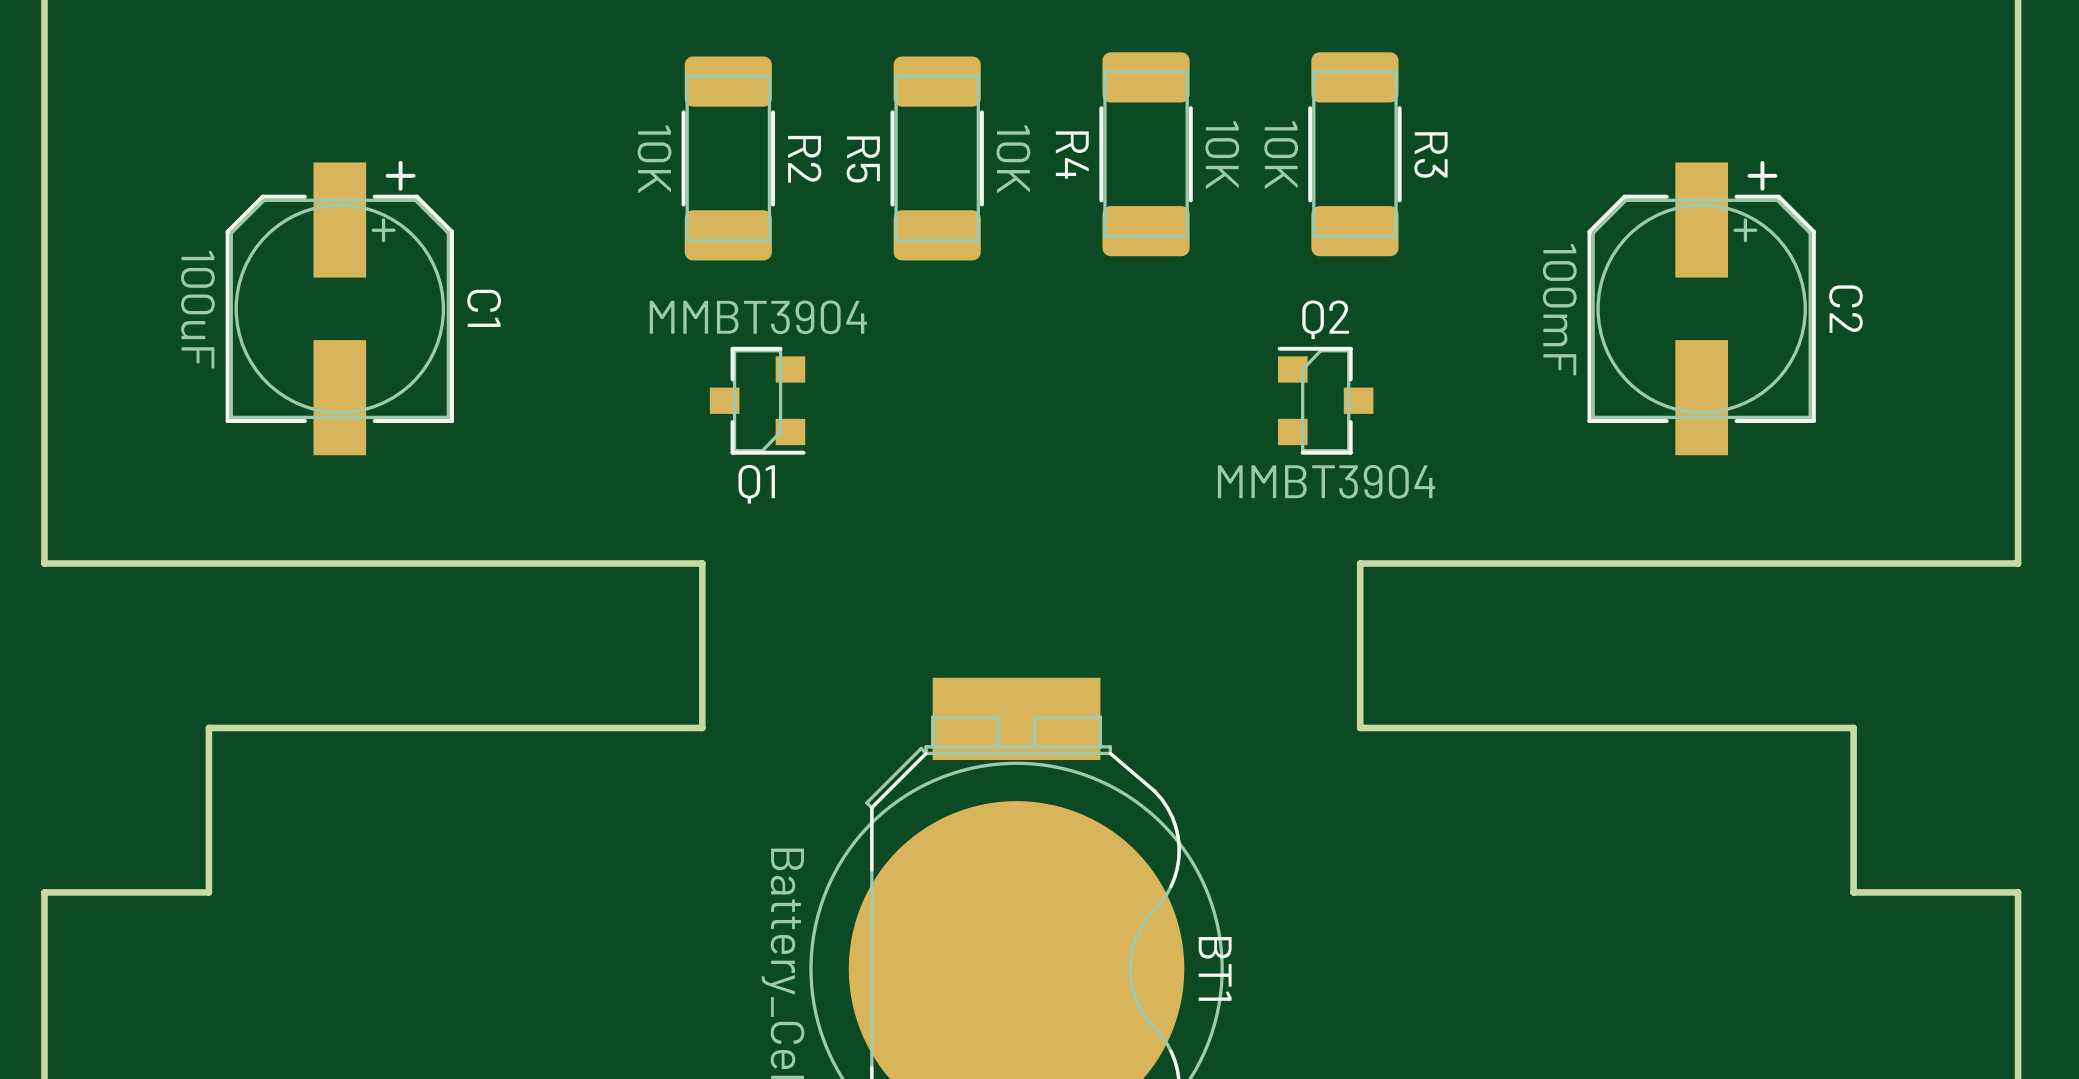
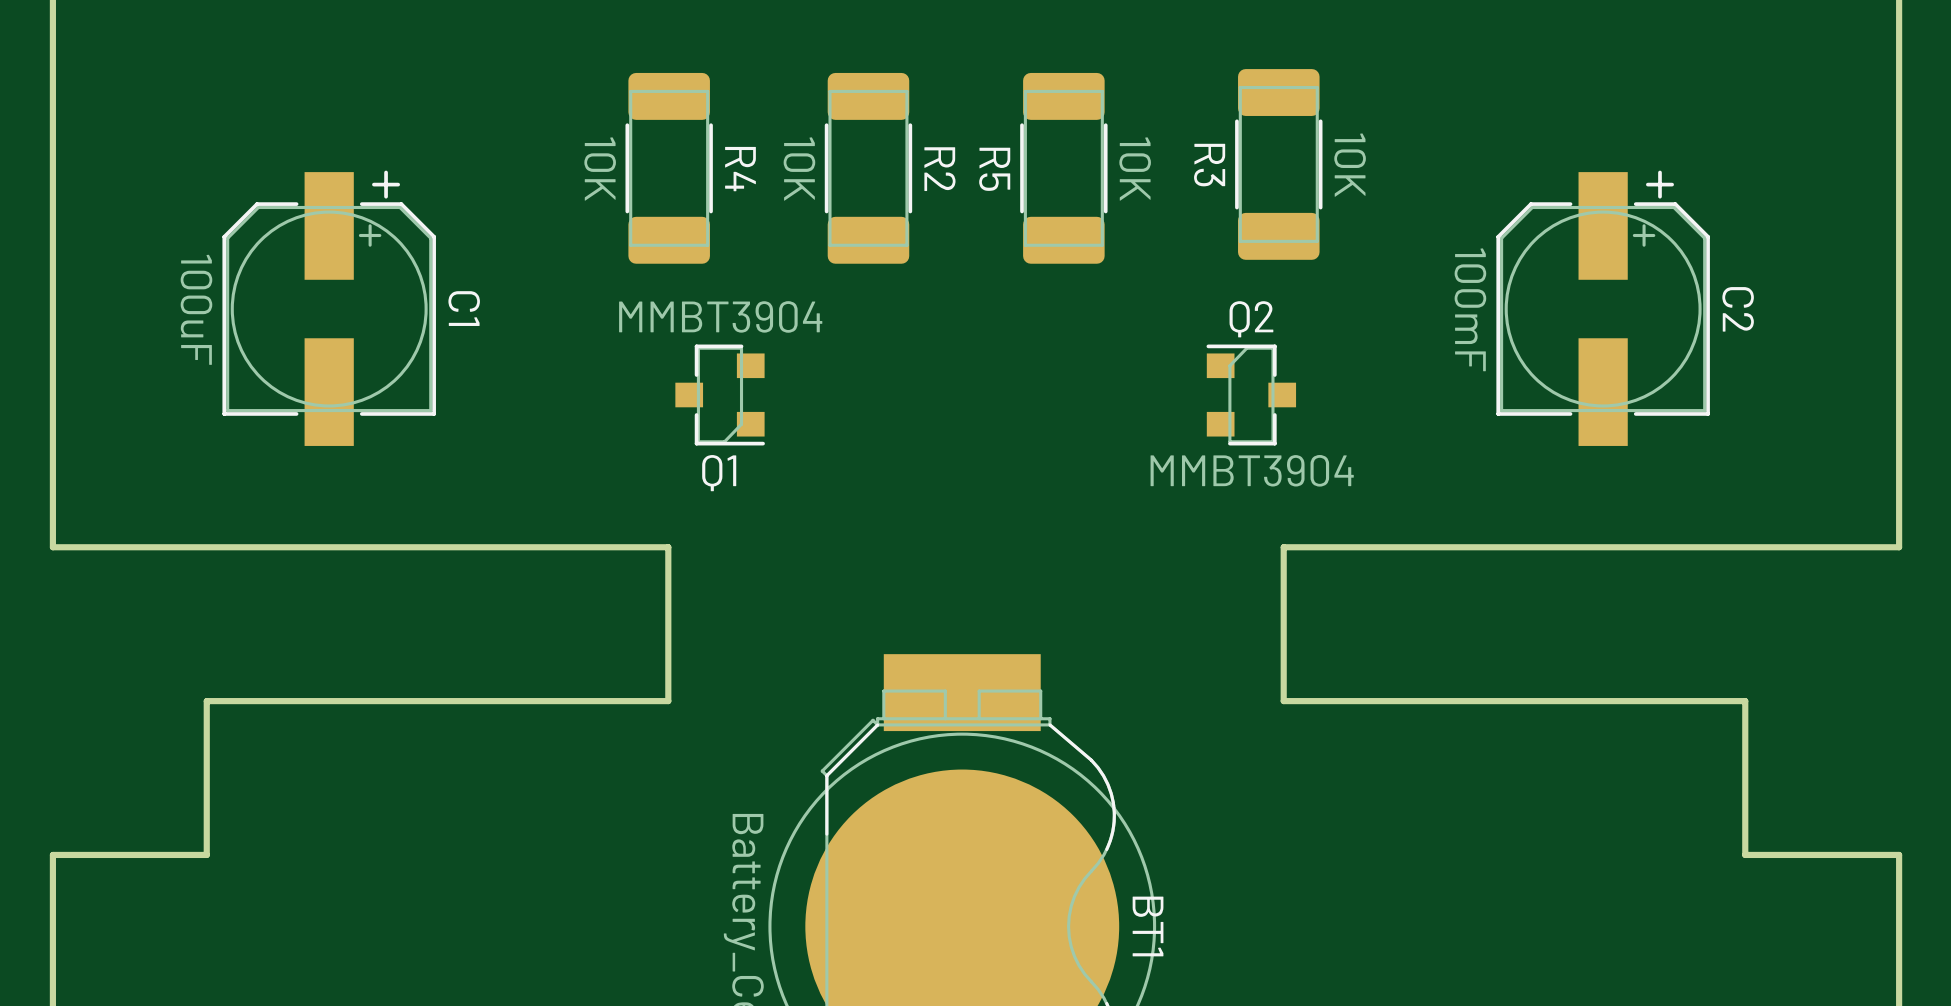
R4 position: (1146, 154) -> (669, 168)
R3 name position: R3 (1430, 154) -> R3 (1209, 165)
R4 name position: R4 (1072, 155) -> R4 (740, 169)
R4 value position: 10K (1222, 155) -> 10K (600, 169)
R3 value position: 10K (1281, 155) -> 10K (1350, 165)
R2 position: (728, 158) -> (868, 168)
R5 position: (937, 158) -> (1063, 168)

